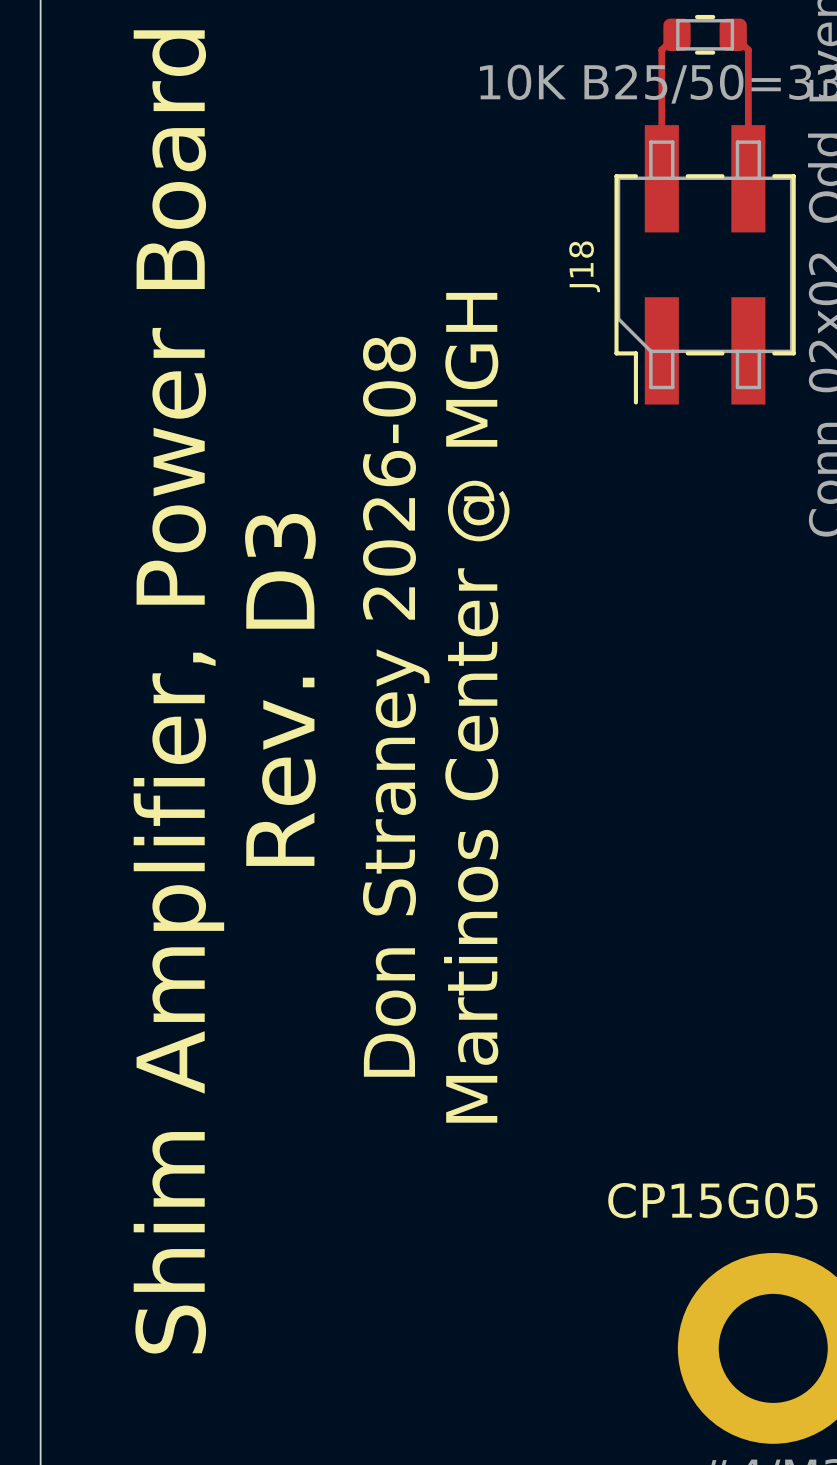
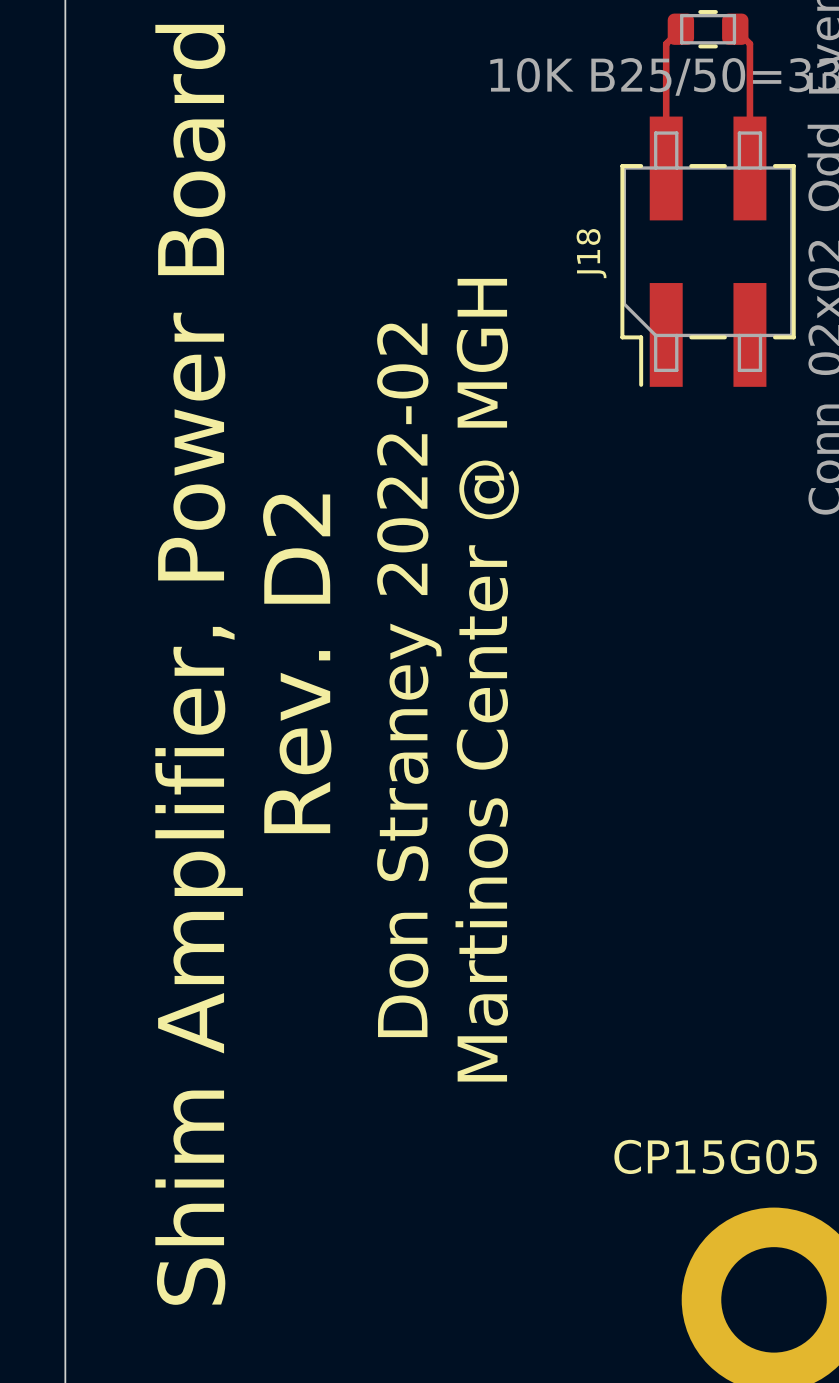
text: Rev. D3 (280, 689) -> Rev. D2 (297, 663)
text: Don Straney 2026-08 (396, 706) -> Don Straney 2022-02 (409, 680)

